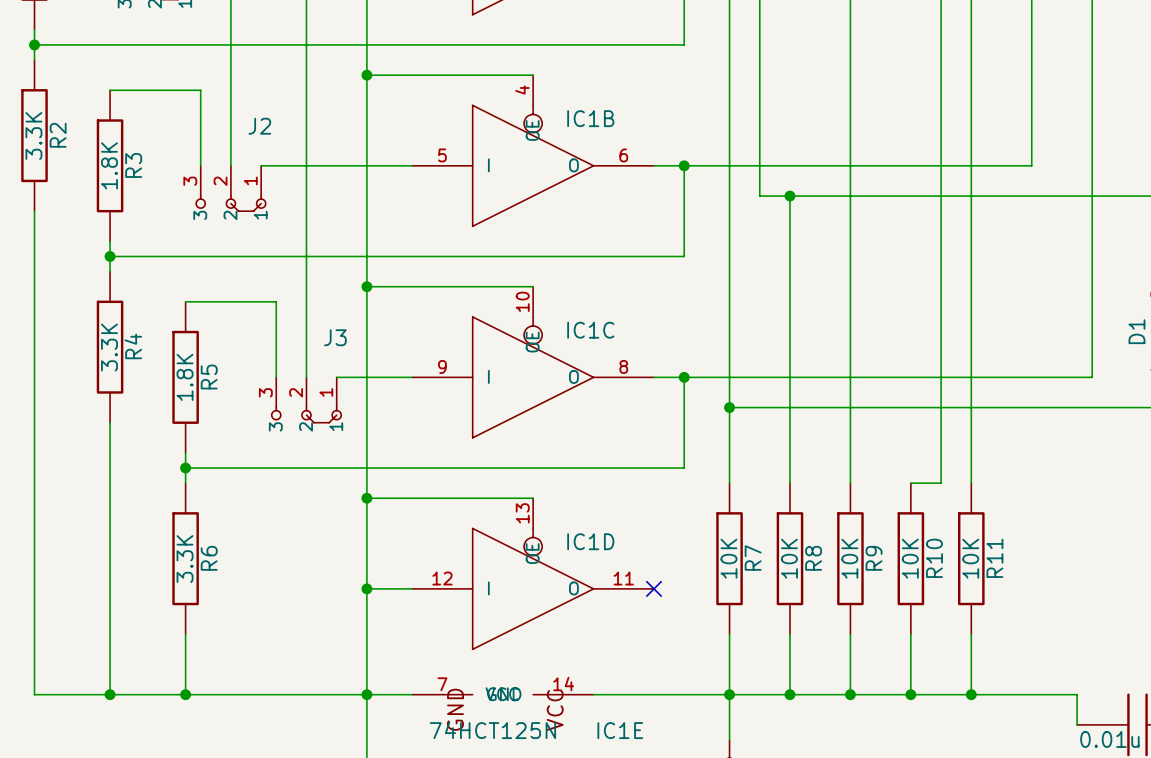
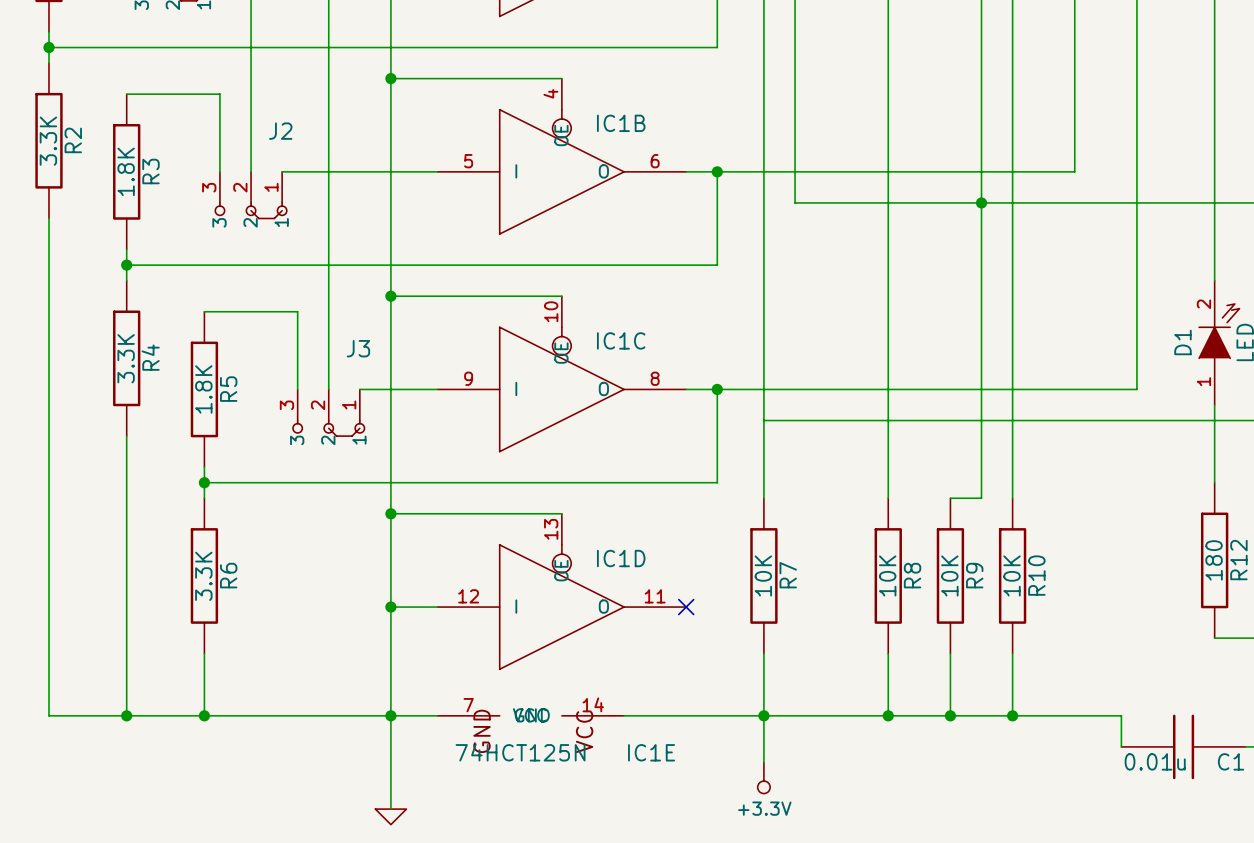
wire: (789, 196) (789, 483) -> none
junction: (789, 196) -> none
junction: none -> (981, 202)
junction: (729, 407) -> none
R8: 10K (789, 558) -> none
R9 name: R9 (874, 558) -> R8 (912, 575)
R10 name: R10 (934, 558) -> R9 (974, 575)
R11 name: R11 (994, 558) -> R10 (1036, 575)
wire: (789, 634) (789, 694) -> none
junction: (789, 694) -> none

